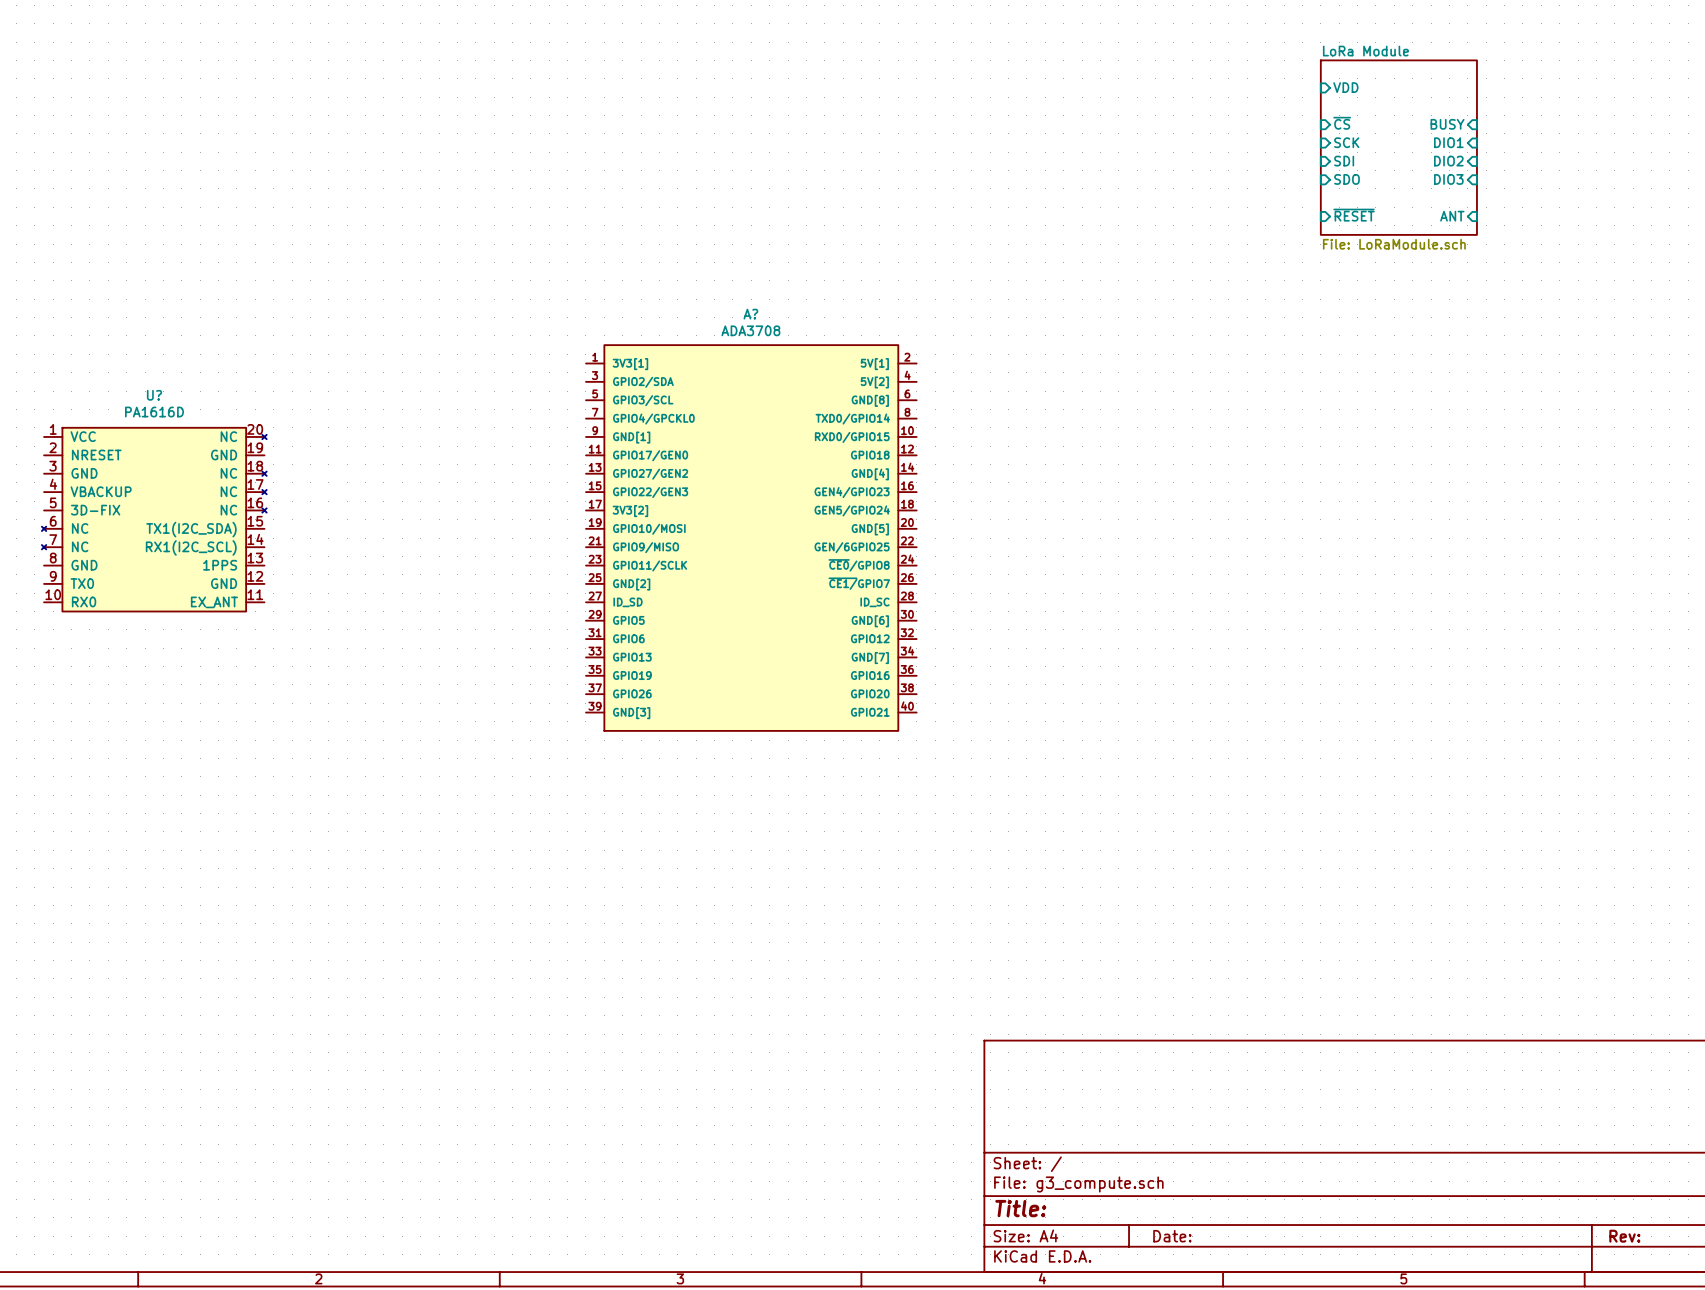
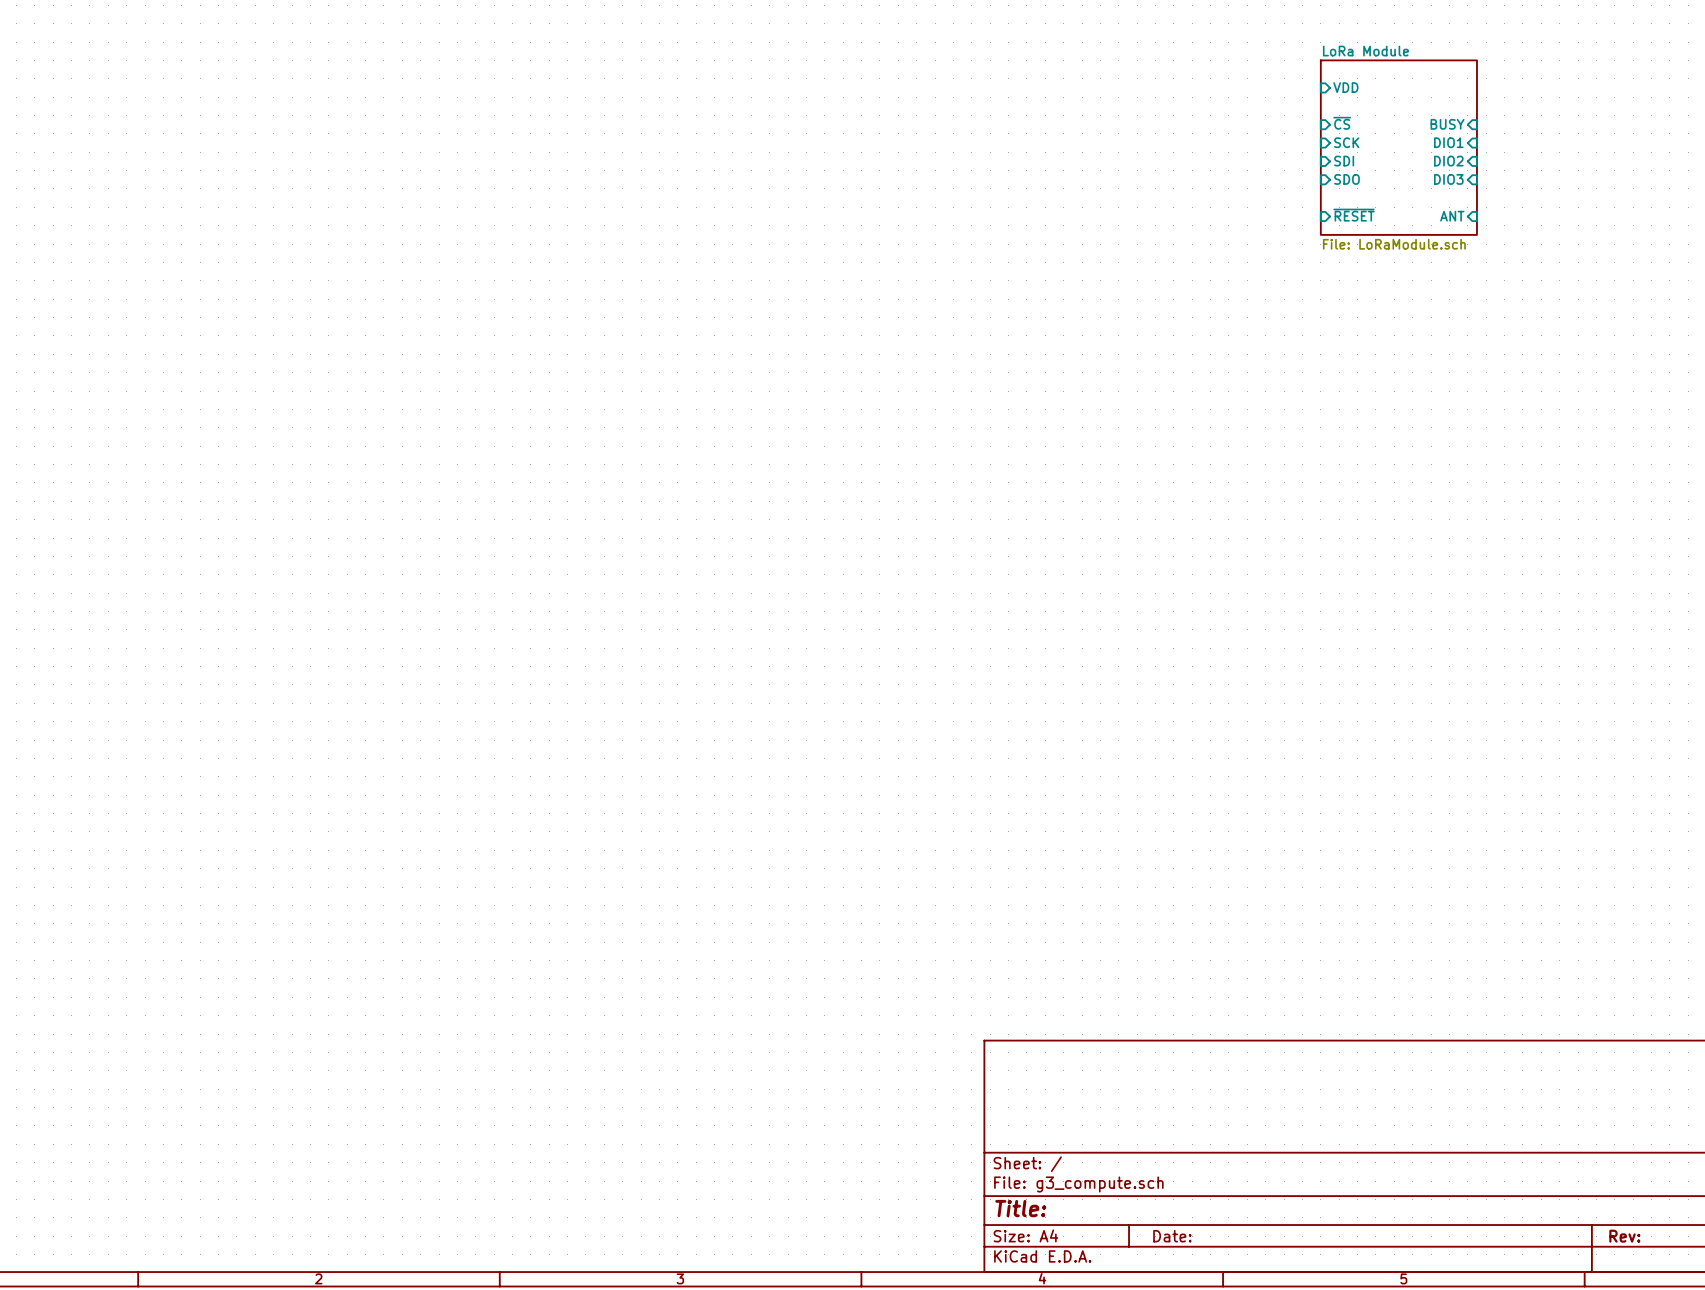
U?: PA1616D (154, 519) -> none
A?: ADA3708 (751, 538) -> none

